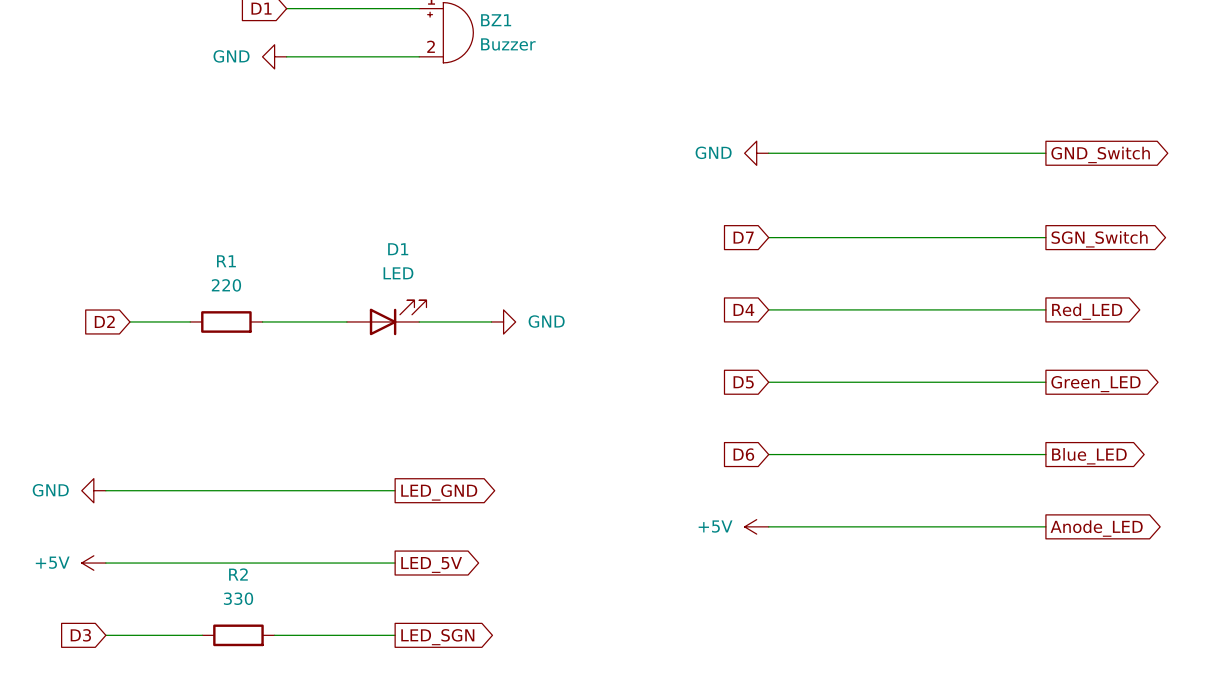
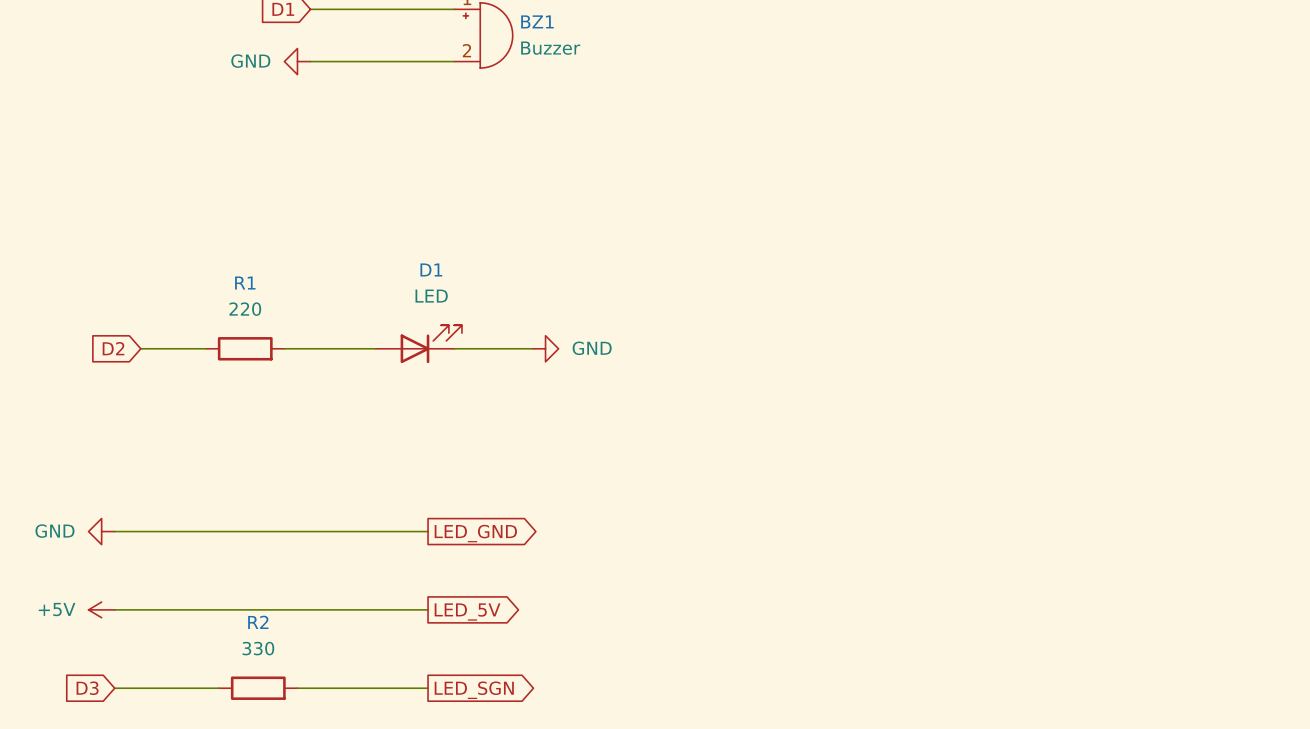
power symbol: GND (756, 153) -> none
wire: (768, 153) (1045, 153) -> none
global label: GND_Switch (1100, 154) -> none
global label: D7 (743, 237) -> none
wire: (768, 237) (1045, 237) -> none
global label: SGN_Switch (1099, 239) -> none
global label: D4 (743, 309) -> none
wire: (768, 309) (1045, 309) -> none
global label: Red_LED (1087, 311) -> none
global label: D5 (743, 382) -> none
wire: (768, 382) (1045, 382) -> none
global label: Green_LED (1095, 384) -> none
global label: D6 (743, 454) -> none
wire: (768, 454) (1045, 454) -> none
global label: Blue_LED (1089, 456) -> none
power symbol: +5V (756, 526) -> none
wire: (768, 526) (1045, 526) -> none
global label: Anode_LED (1096, 528) -> none

